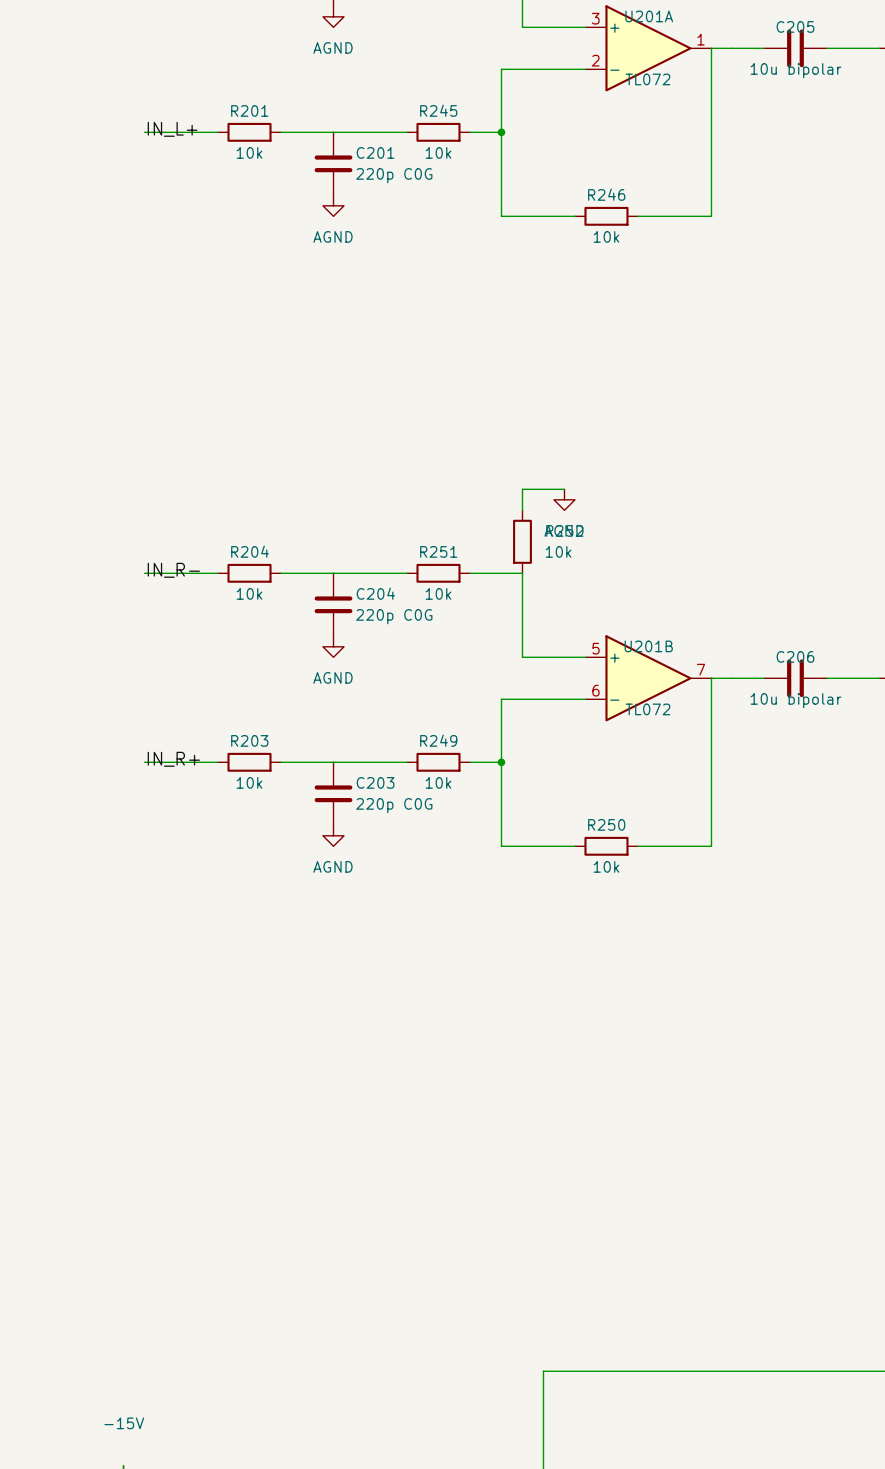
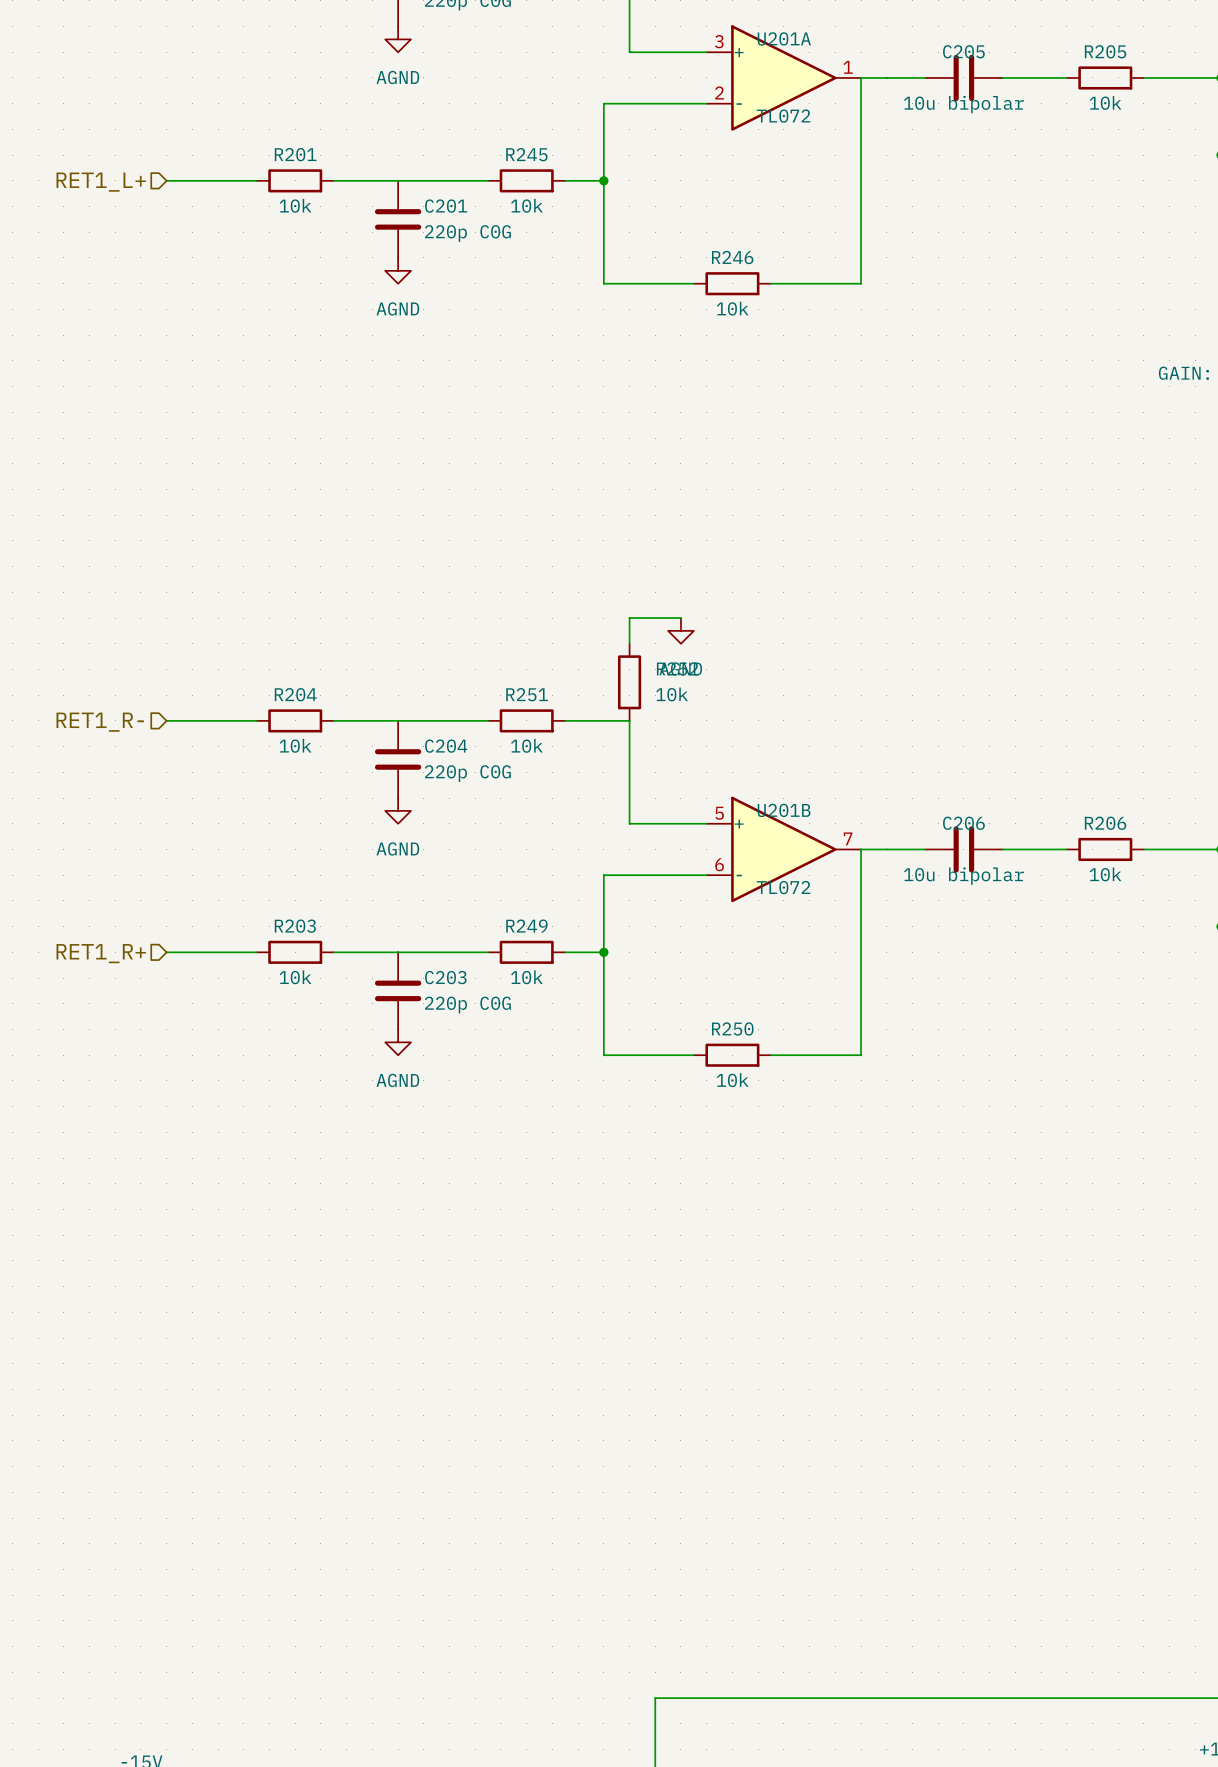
label: IN_L+ (172, 129) -> none
hierarchical label: none -> RET1_L+ (101, 182)
label: IN_R- (173, 570) -> none
hierarchical label: none -> RET1_R- (100, 722)
label: IN_R+ (173, 759) -> none
hierarchical label: none -> RET1_R+ (101, 953)

